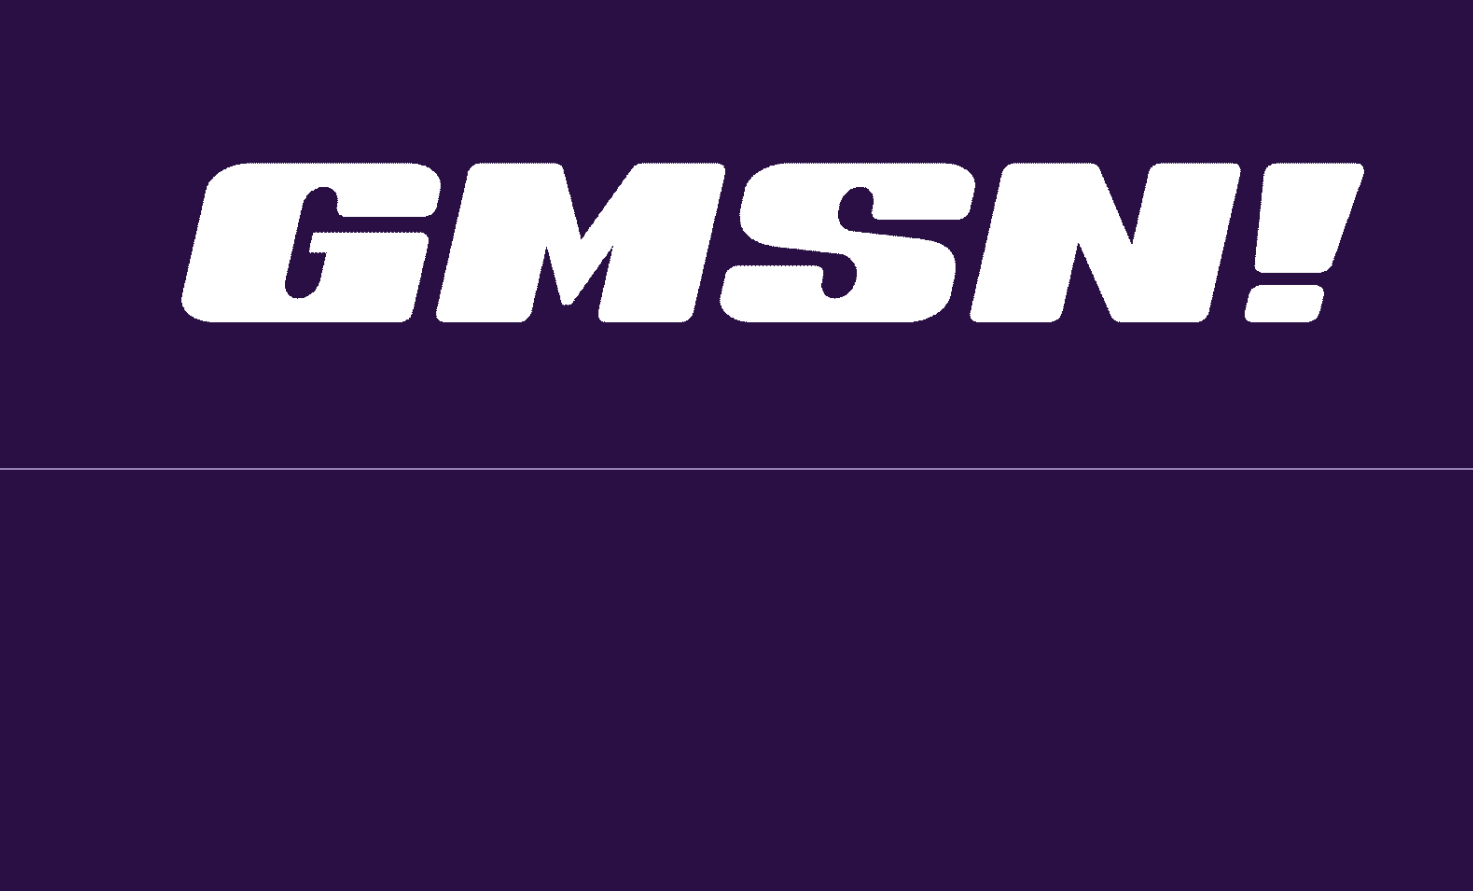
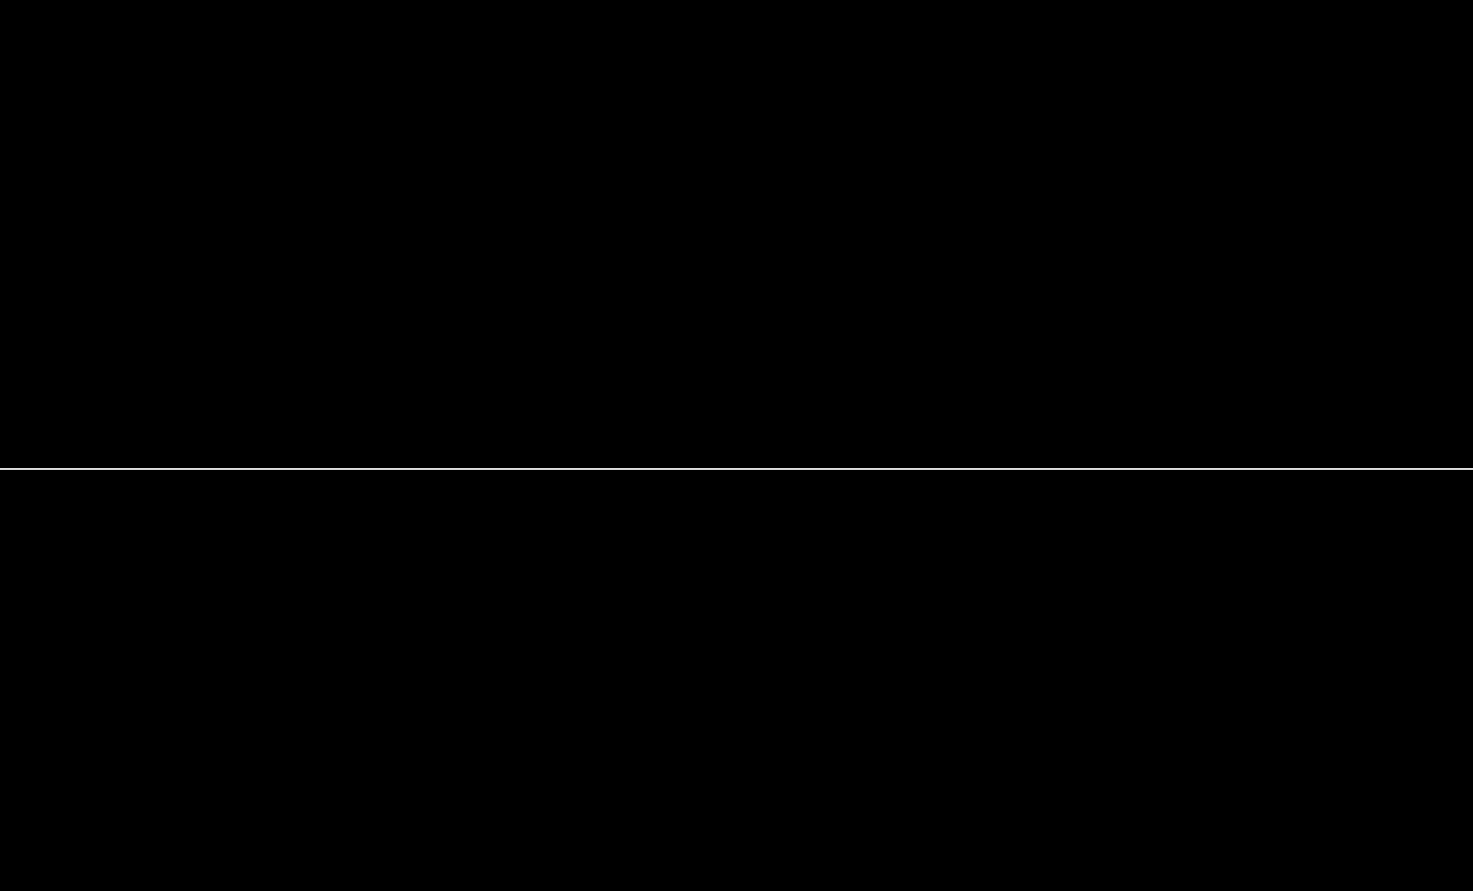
drawing: [181, 162, 1365, 323] -> none

